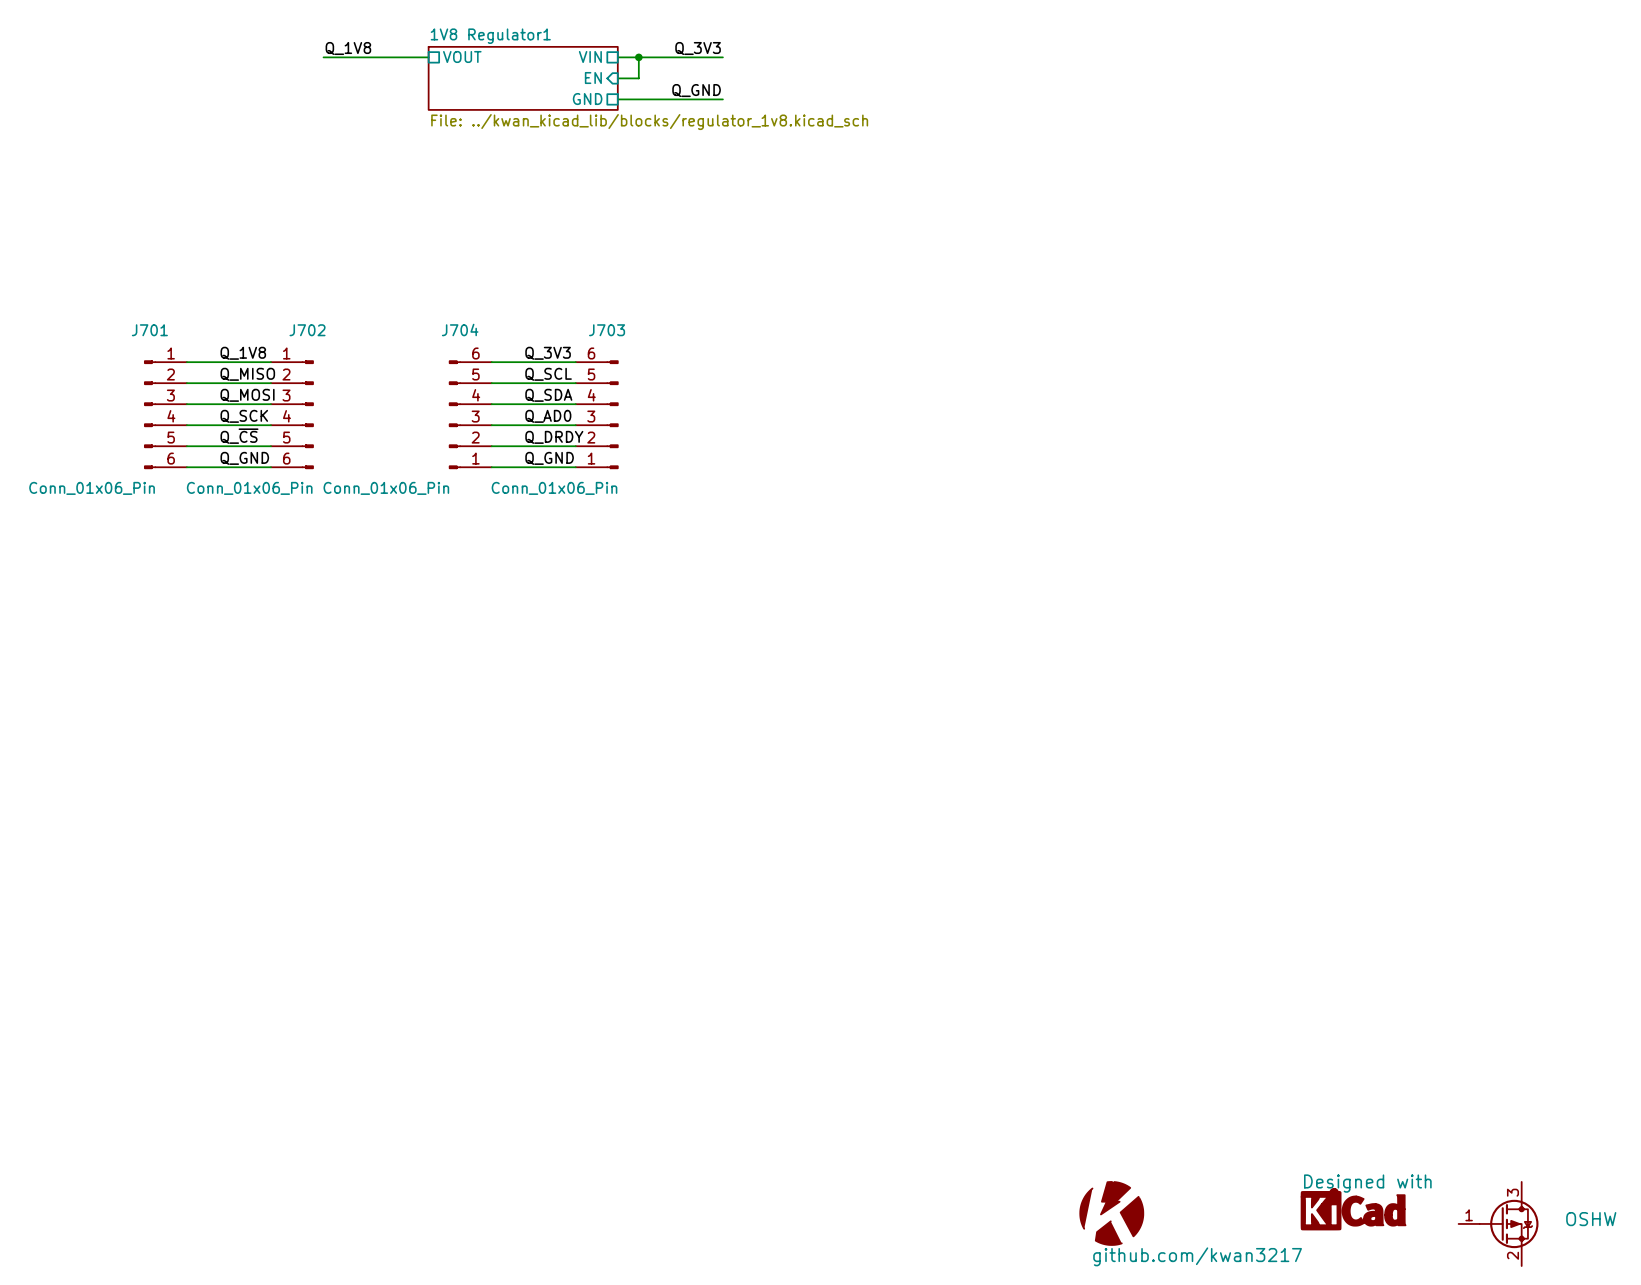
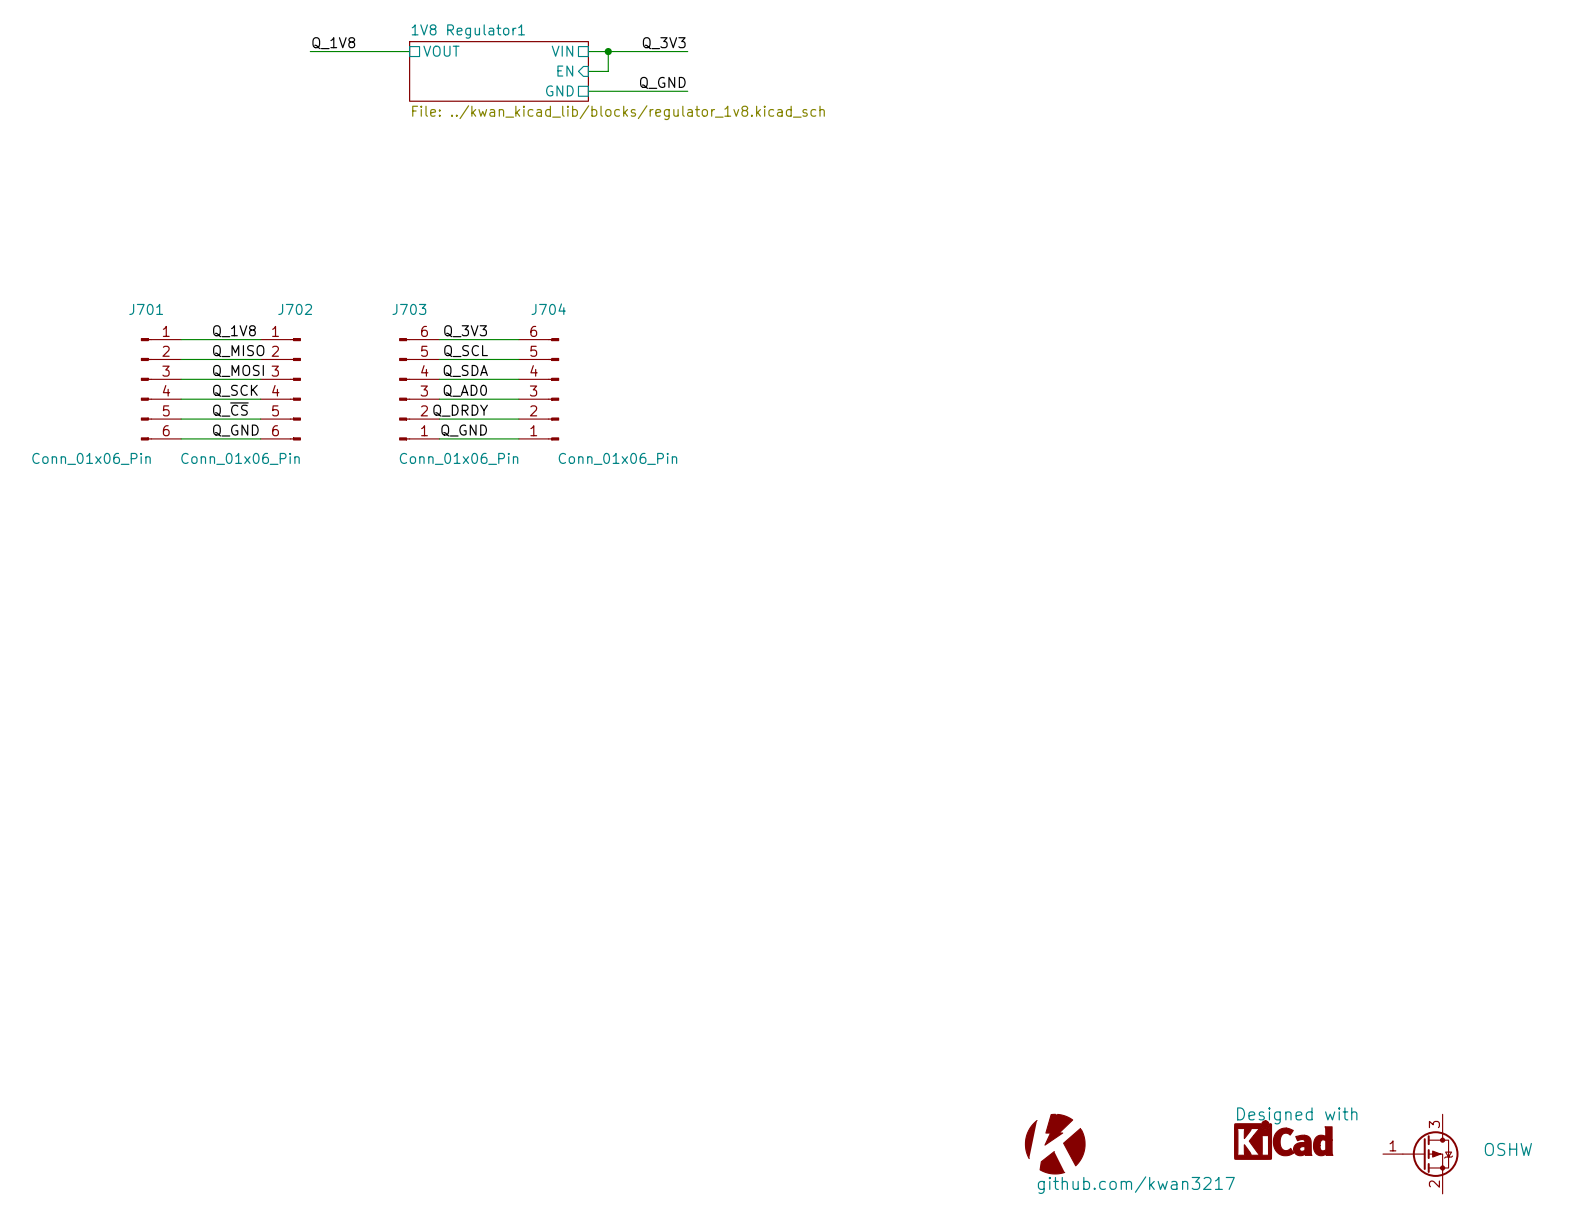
label position: Q_3V3 (548, 353) -> Q_3V3 (465, 331)
label position: Q_SCL (548, 374) -> Q_SCL (466, 351)
label position: Q_SDA (548, 395) -> Q_SDA (465, 370)
J704 flip: as is (454, 414) -> left-right (553, 389)
J704 position: (470, 414) -> (539, 389)
J703 position: (597, 414) -> (419, 389)
J703 flip: as is (612, 414) -> left-right (404, 389)
label position: Q_AD0 (548, 416) -> Q_AD0 (465, 390)
label position: Q_DRDY (554, 437) -> Q_DRDY (460, 410)
label position: Q_GND (549, 458) -> Q_GND (464, 430)

